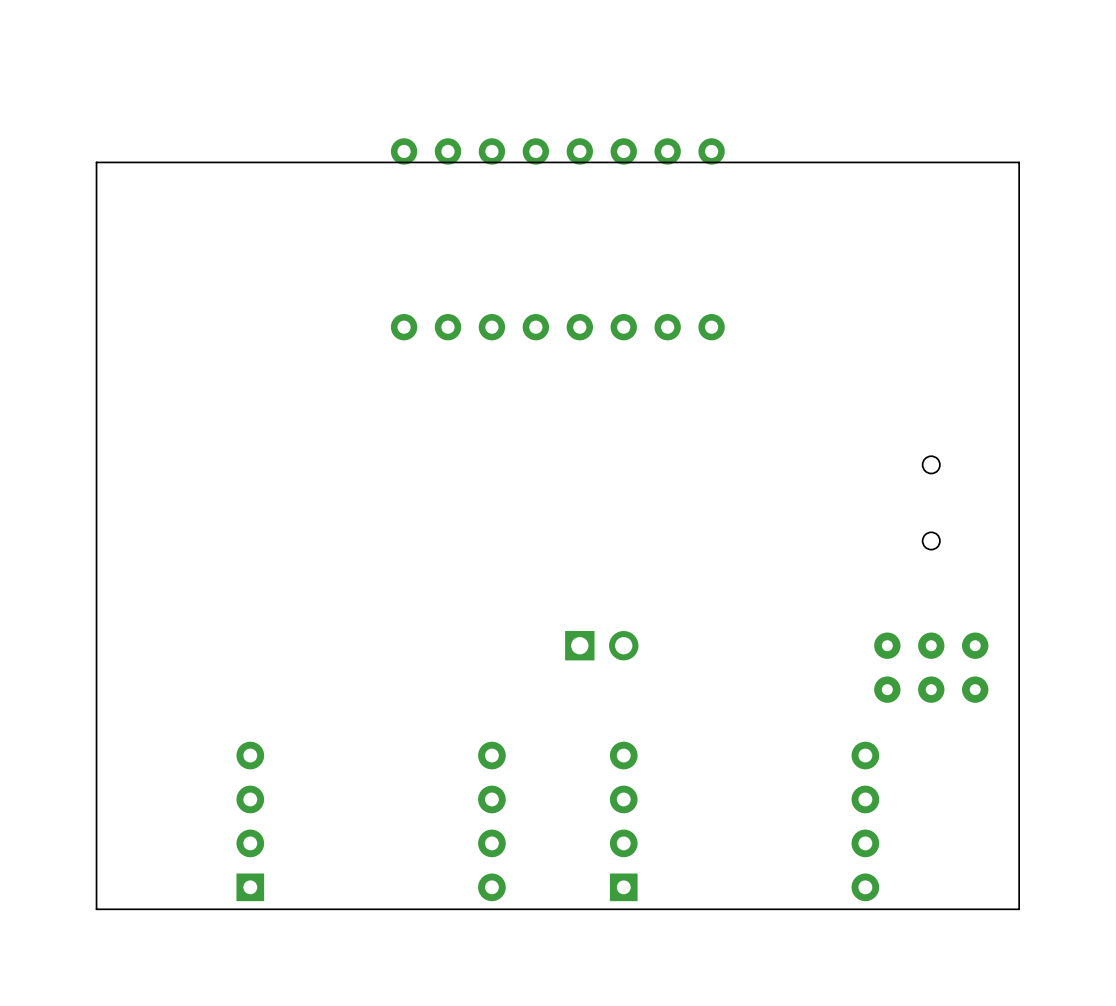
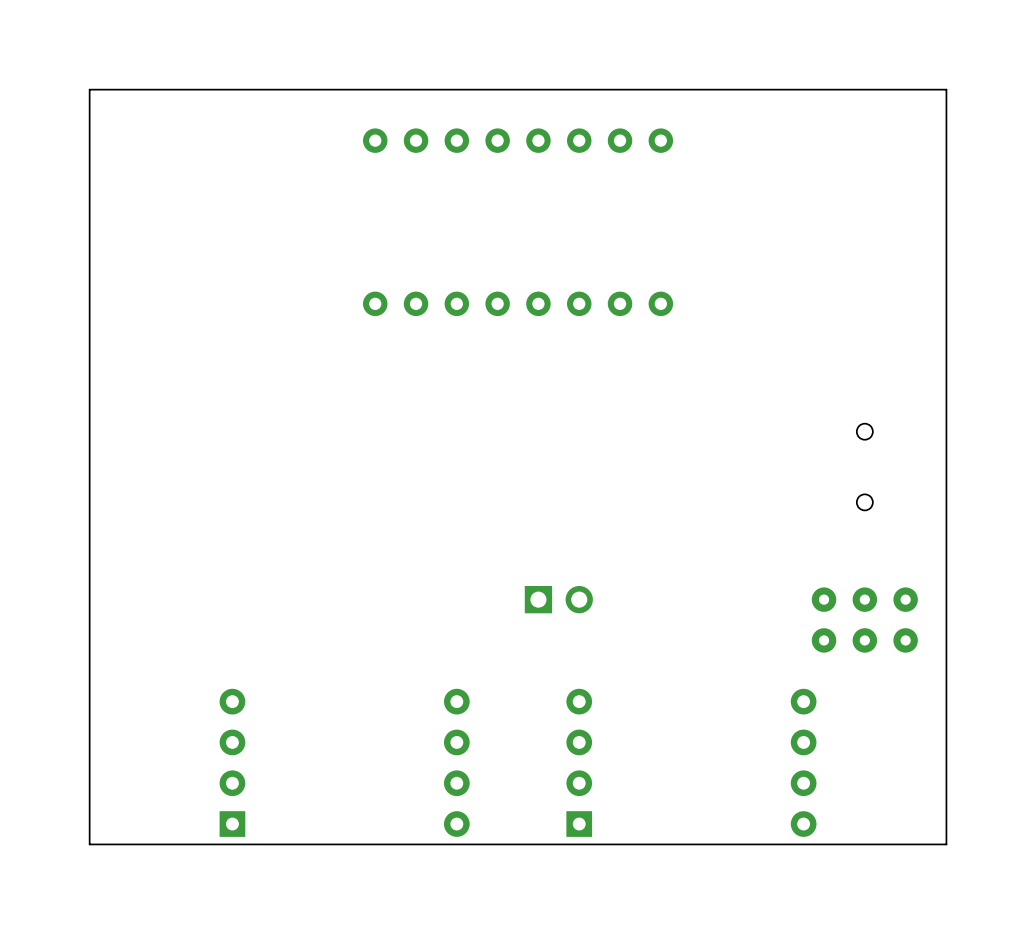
board edge: (1019, 162) (96, 162) -> (946, 150) (946, 89) (89, 89) (89, 150)

